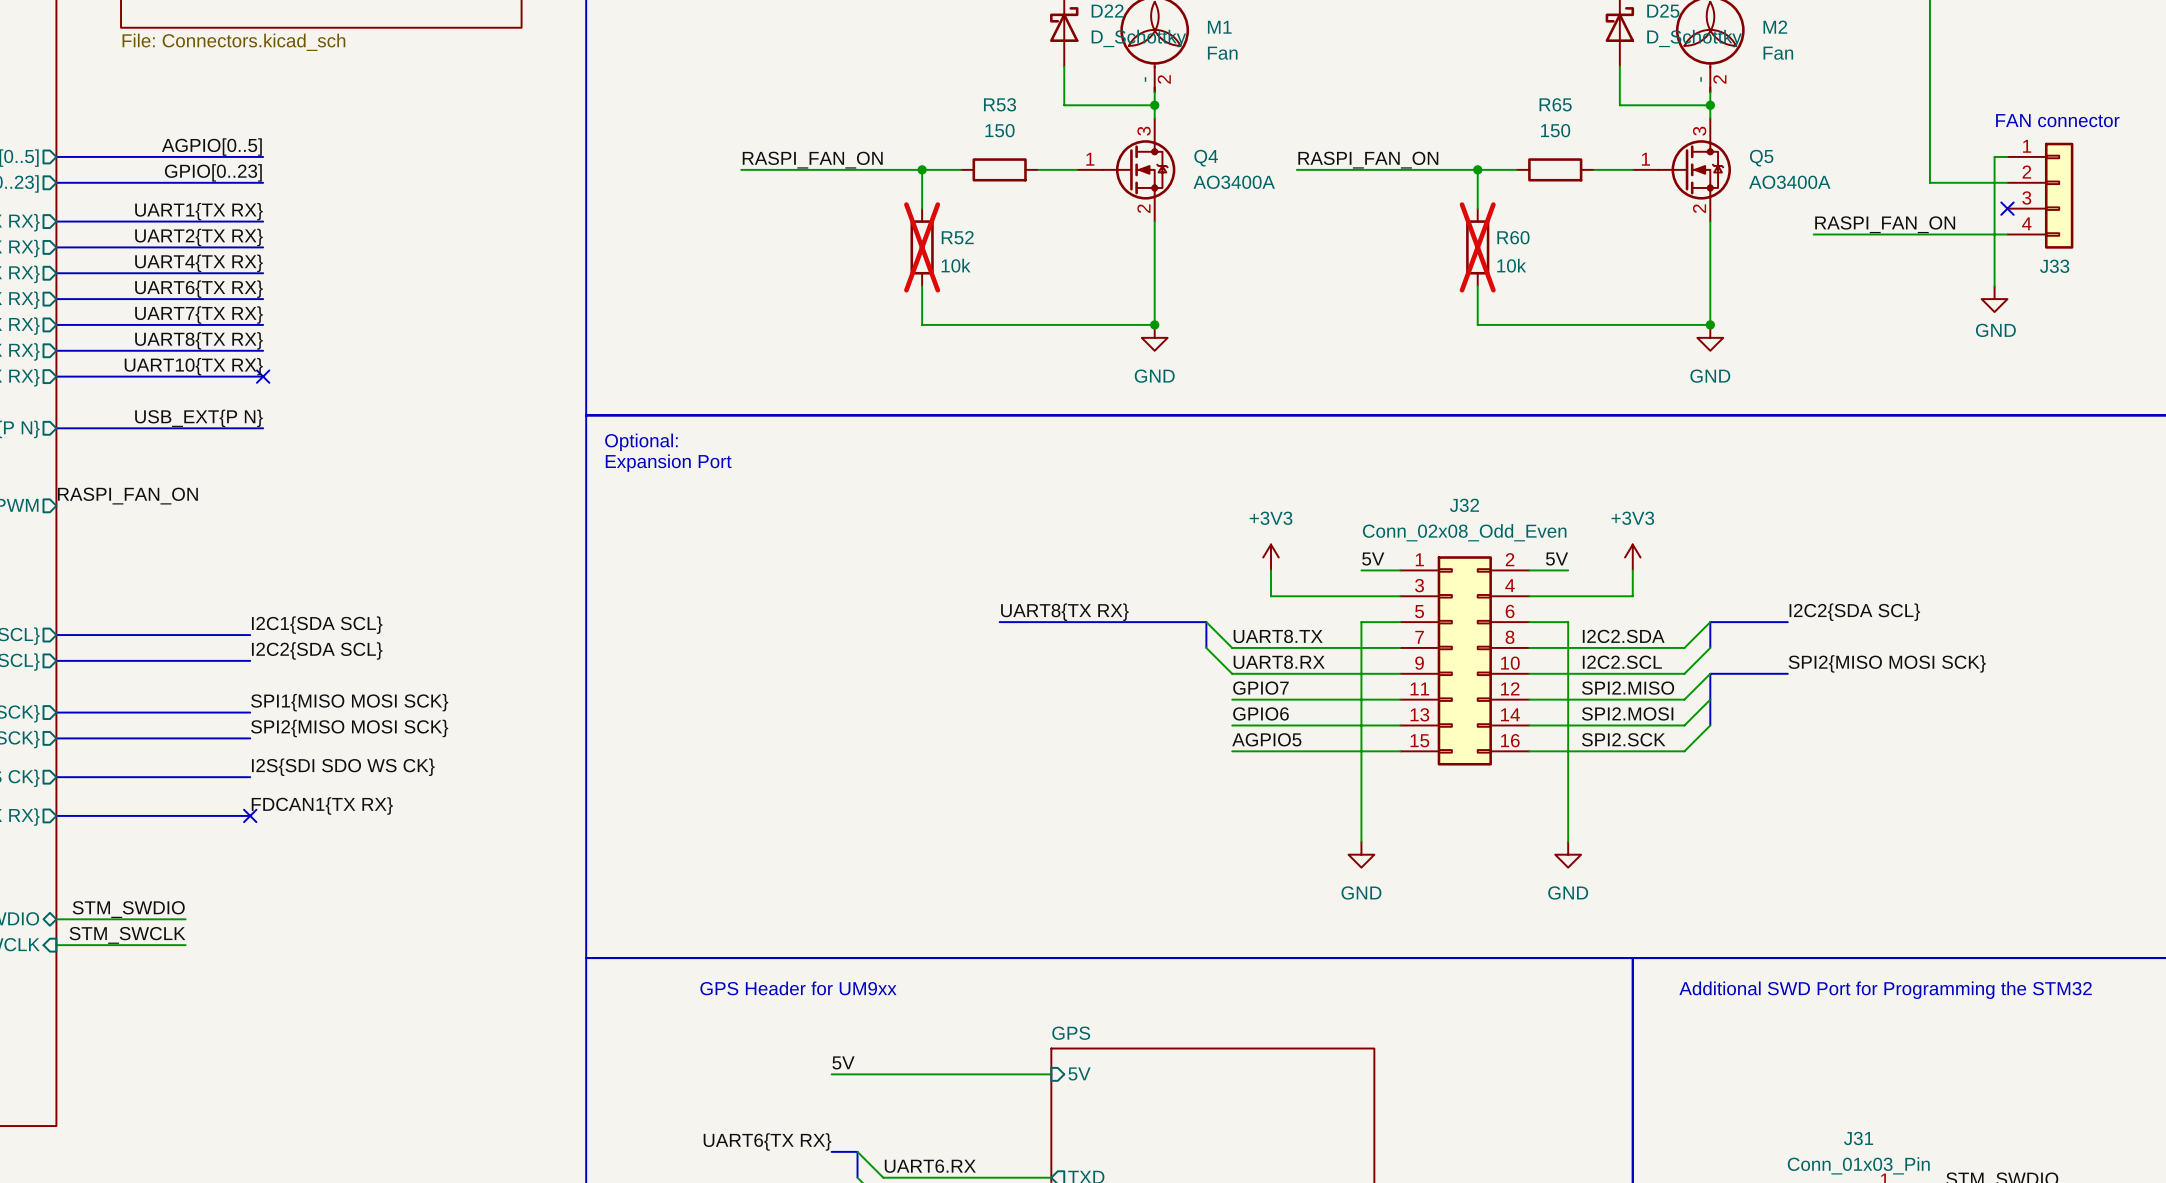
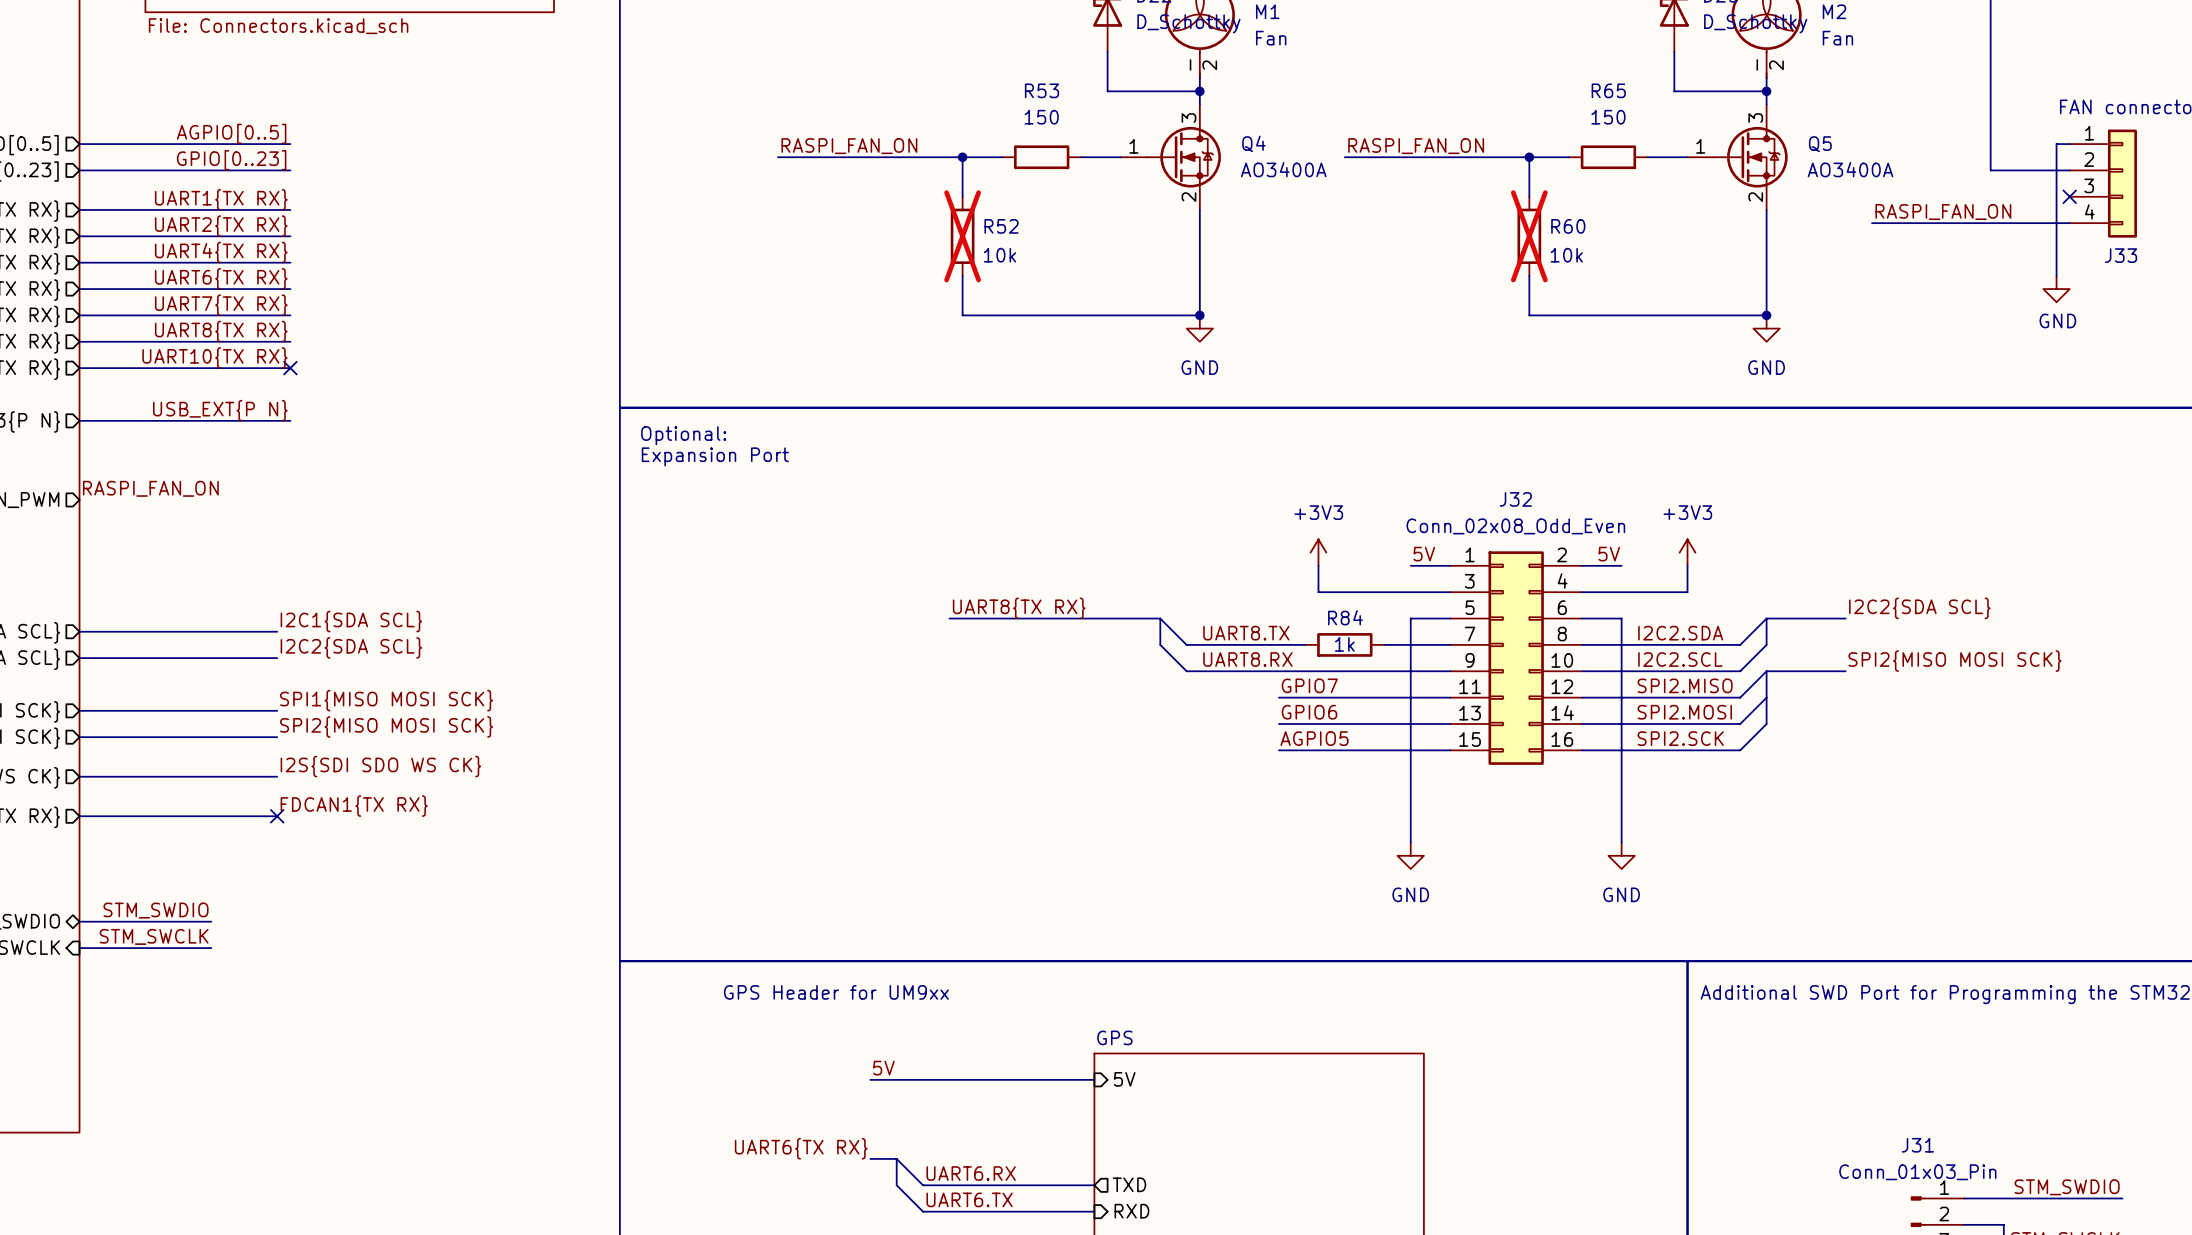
label position: UART8{TX RX} (1064, 612) -> UART8{TX RX} (1019, 608)
bus: none -> (949, 618) (1041, 618)
bus: (1115, 622) (1206, 622) (1206, 647) -> (1160, 618) (1160, 644)
wire: (1206, 622) (1232, 647) -> (1160, 618) (1186, 644) (1278, 644)
label position: UART8.TX (1278, 636) -> UART8.TX (1246, 633)
wire: (1206, 647) (1232, 673) -> (1160, 644) (1186, 671) (1278, 671)
wire: (1258, 647) (1335, 647) -> none
R84: none -> 1k (1344, 644)
label position: UART8.RX (1279, 662) -> UART8.RX (1247, 659)

